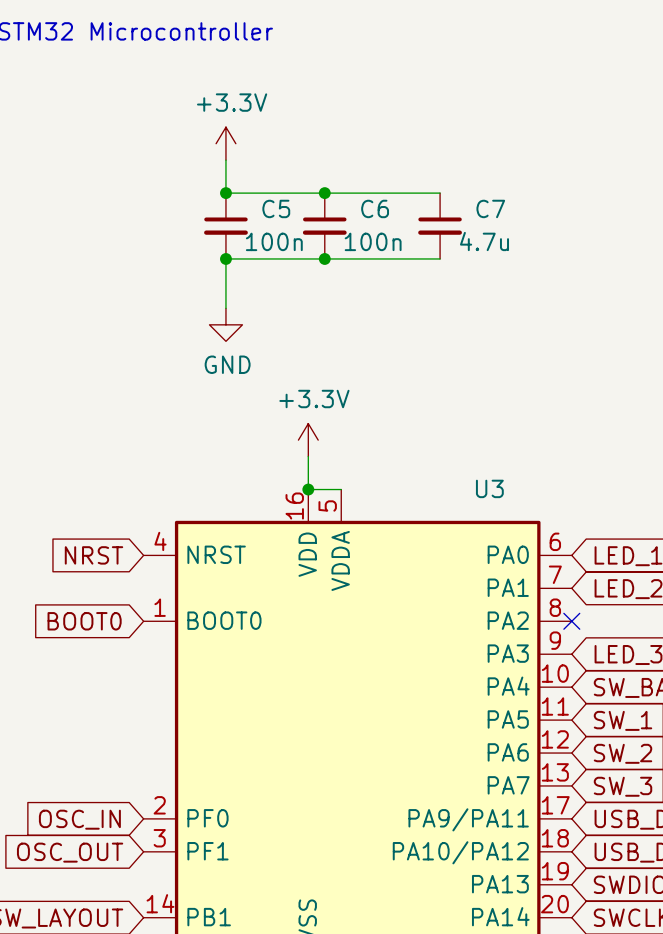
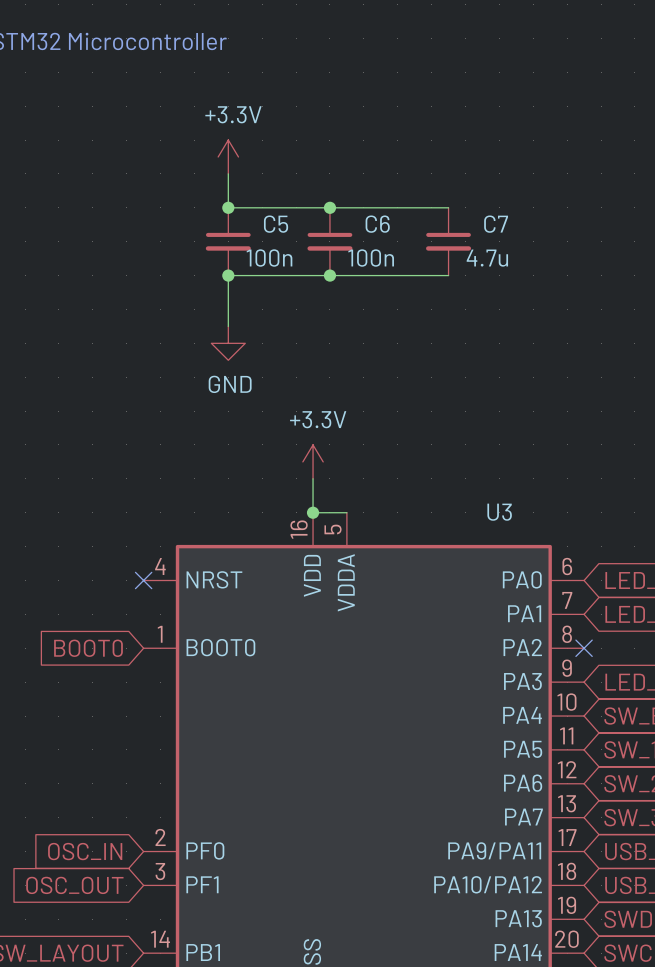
global label: NRST (94, 555) -> none
no-connect mark: none -> (143, 580)

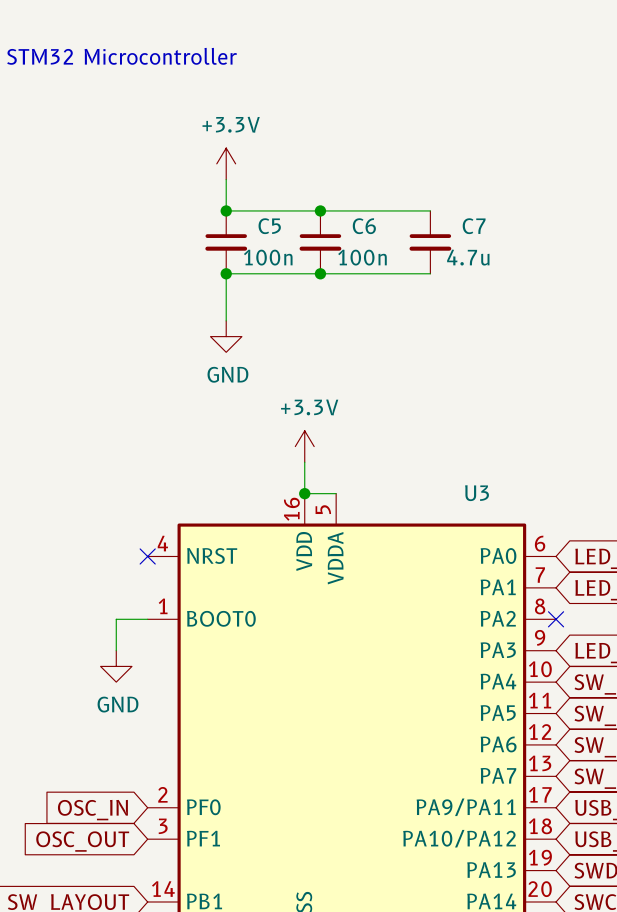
global label: BOOT0 (88, 648) -> none
wire: none -> (147, 619) (116, 619) (116, 650)
power symbol: none -> GND (116, 666)

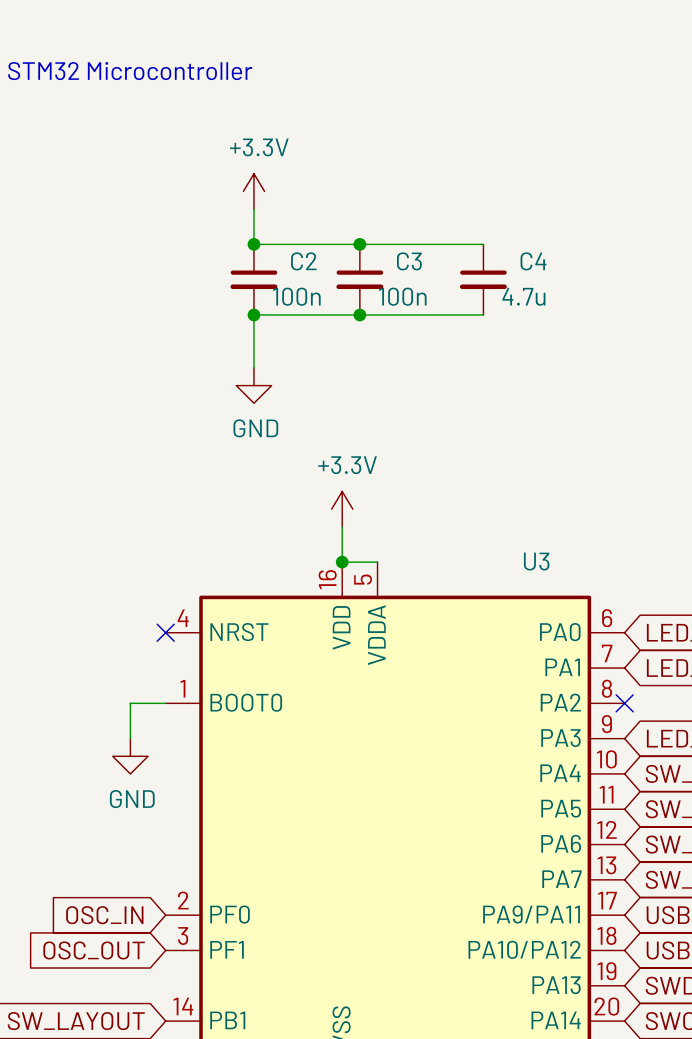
C5 name: C5 (269, 226) -> C2 (303, 261)
C6 name: C6 (364, 226) -> C3 (409, 261)
C7 name: C7 (474, 226) -> C4 (533, 261)

